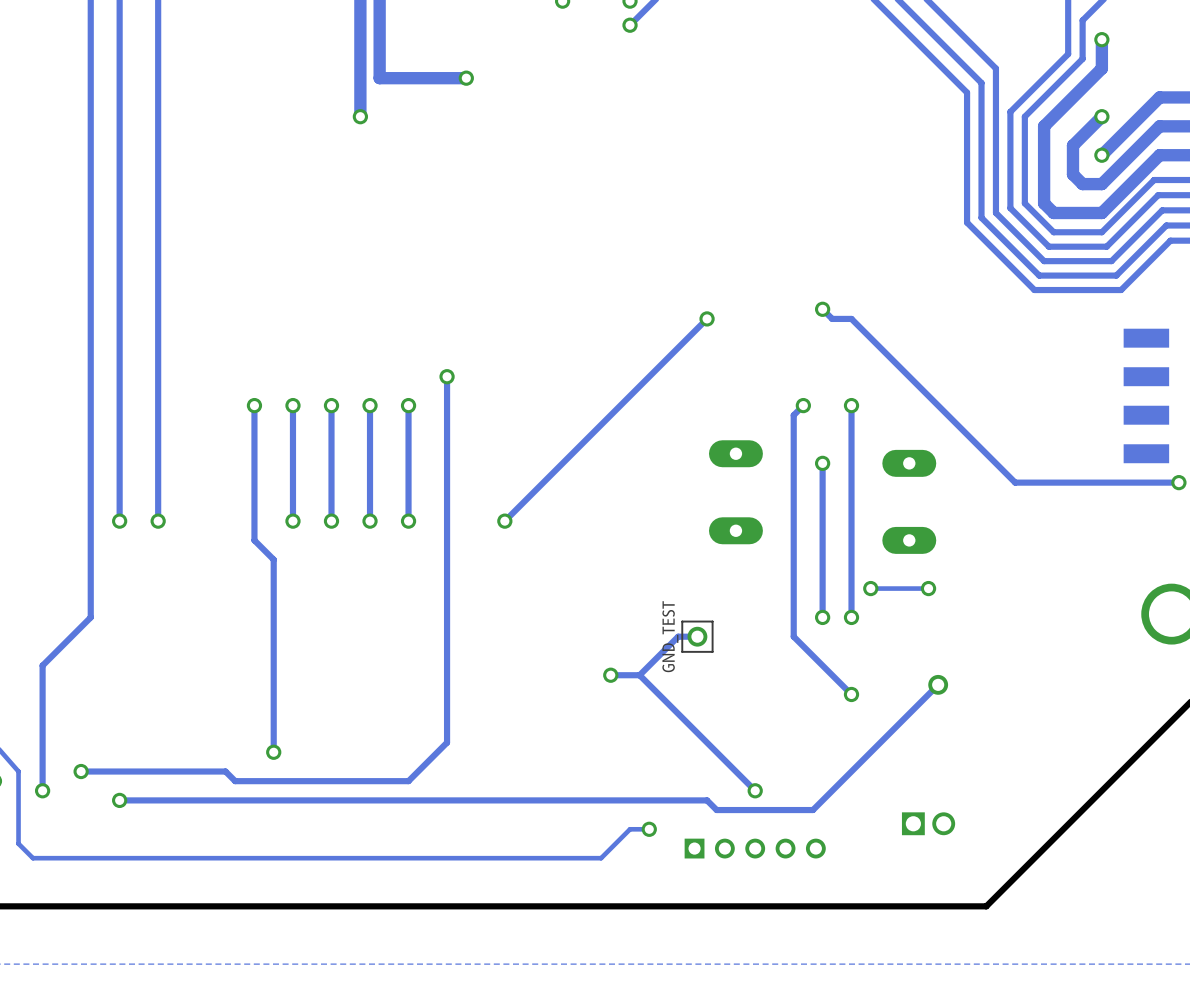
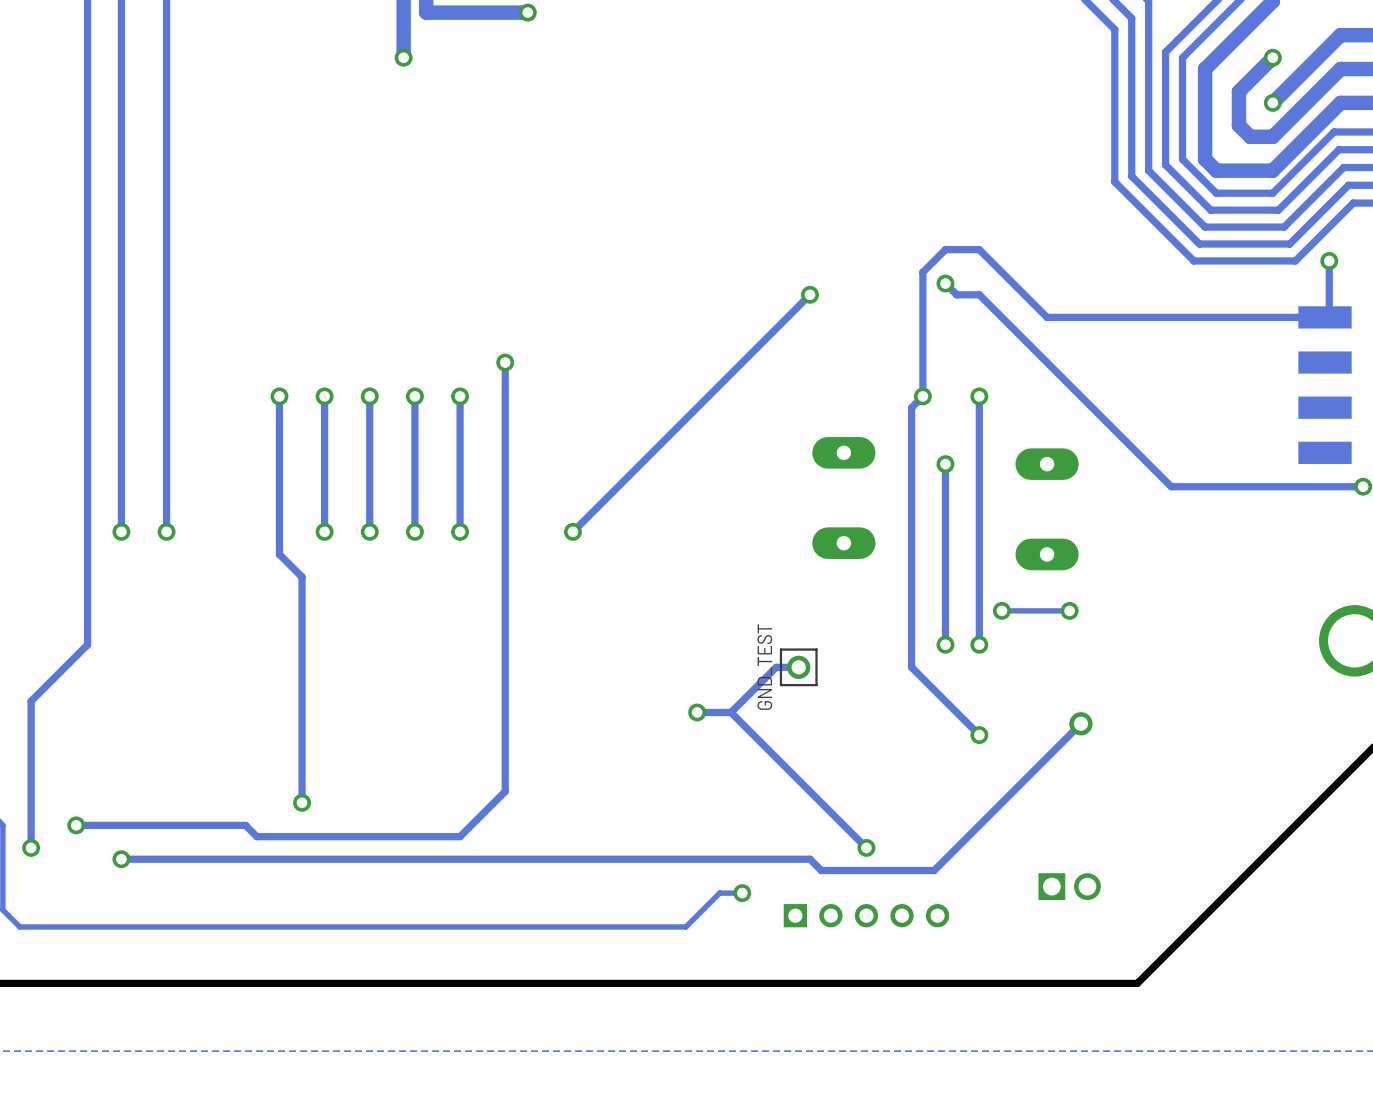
track: none -> (1329, 260) (1329, 313) (1325, 317) (1047, 317) (979, 249) (945, 249) (922, 272) (922, 396)
via: none -> (1329, 260)

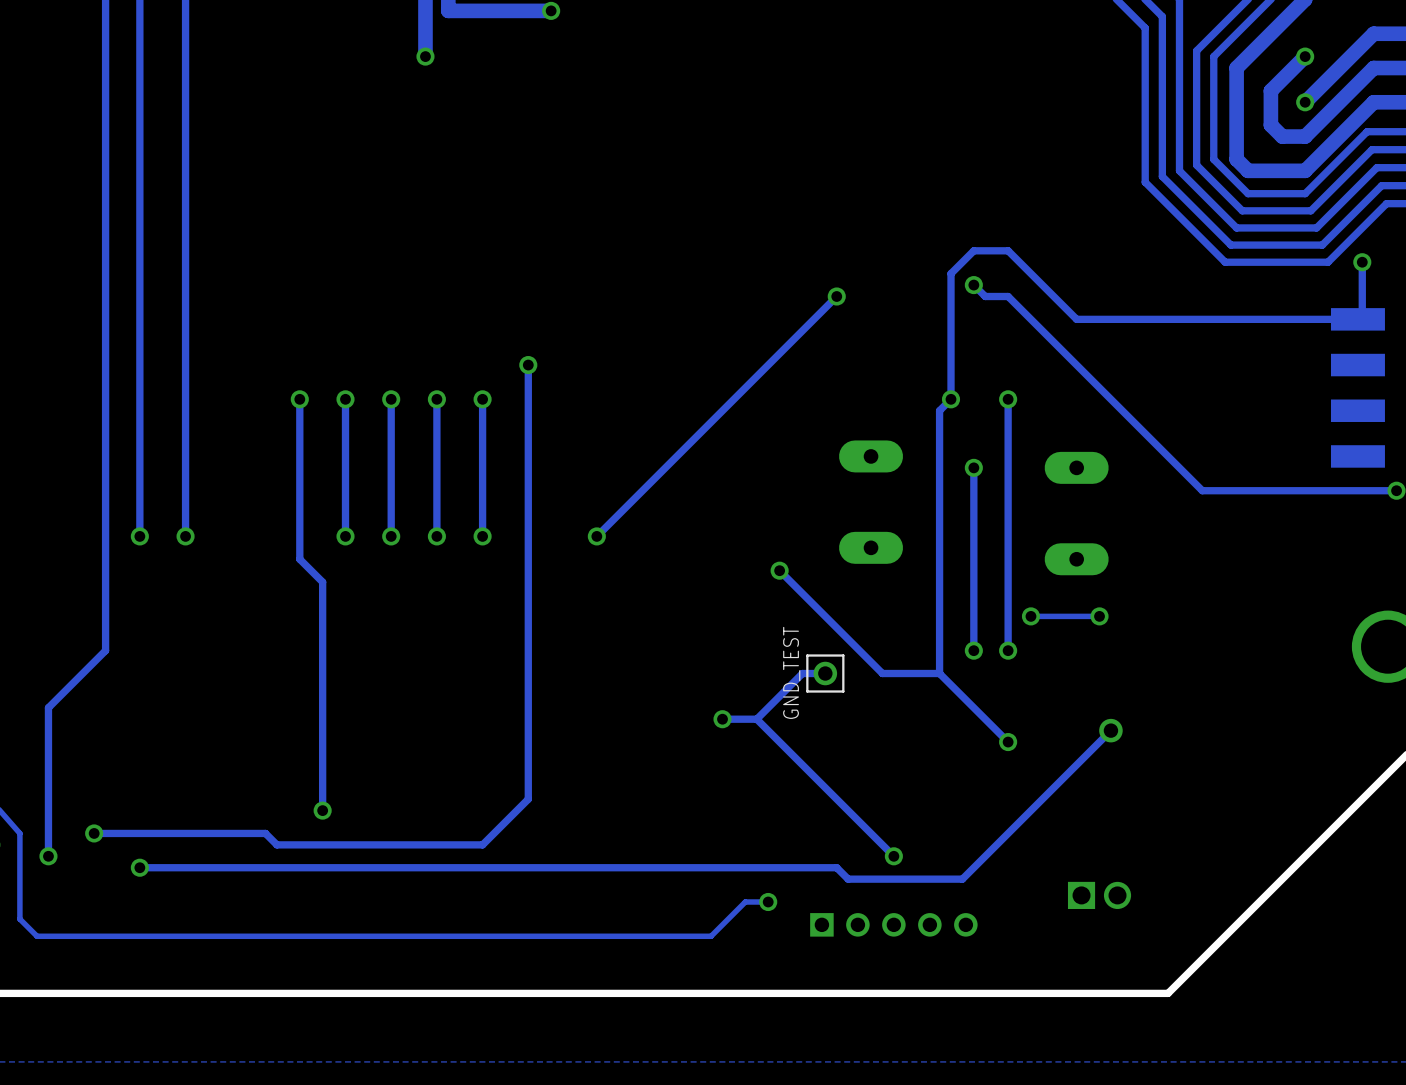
track: none -> (779, 570) (882, 673) (939, 673)
via: none -> (779, 570)

